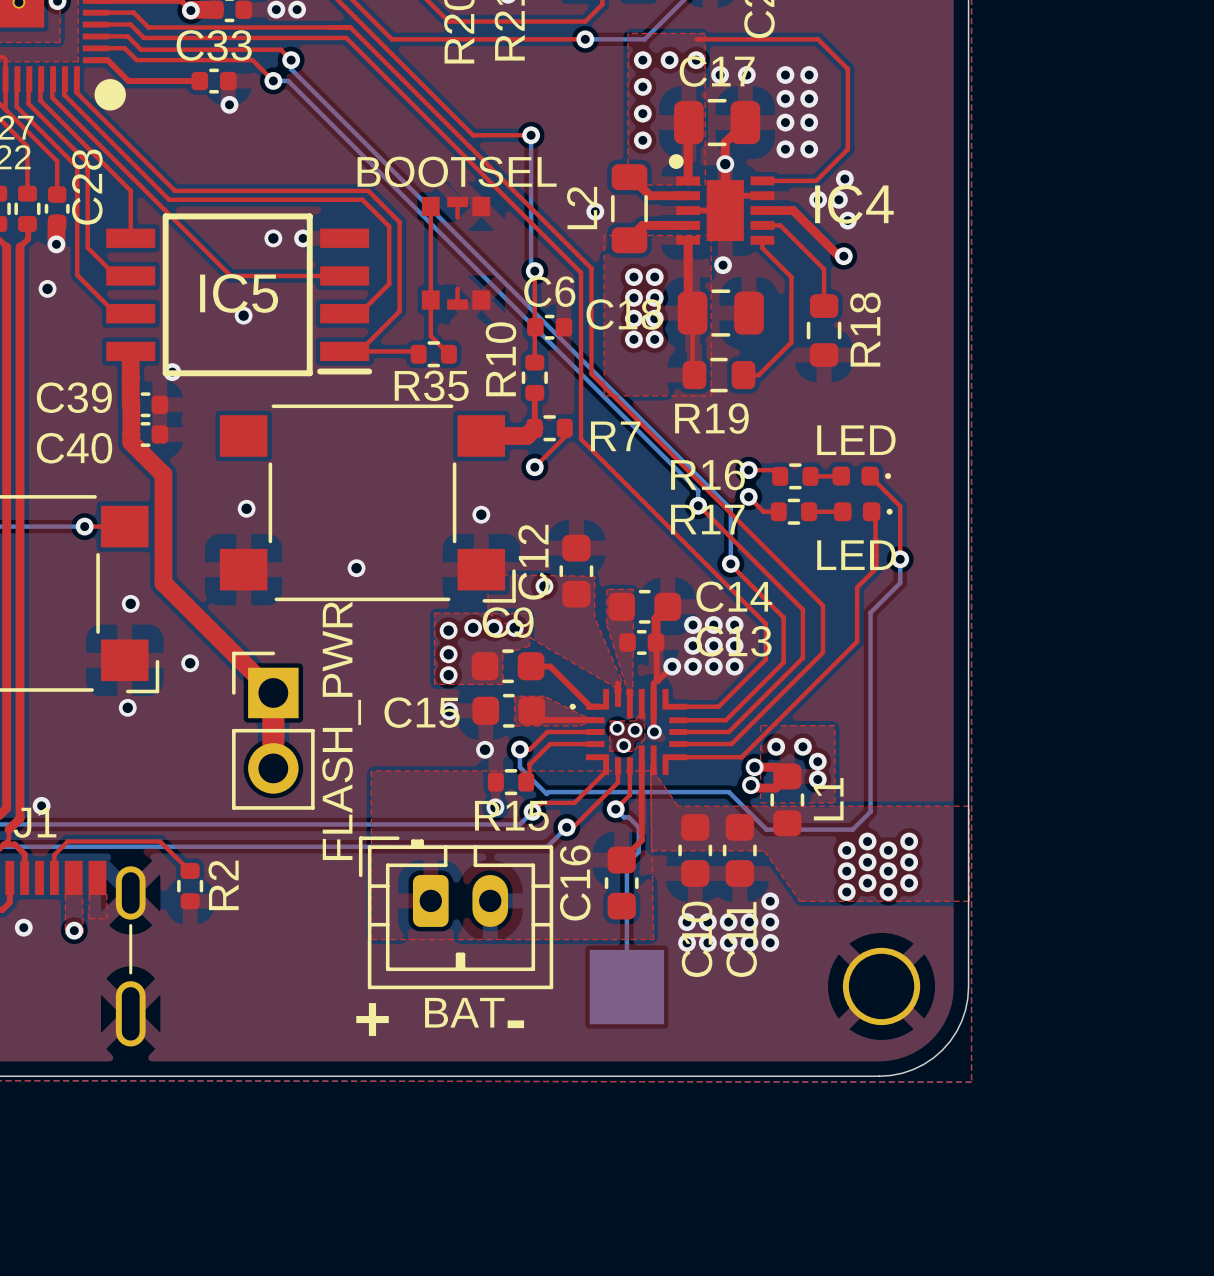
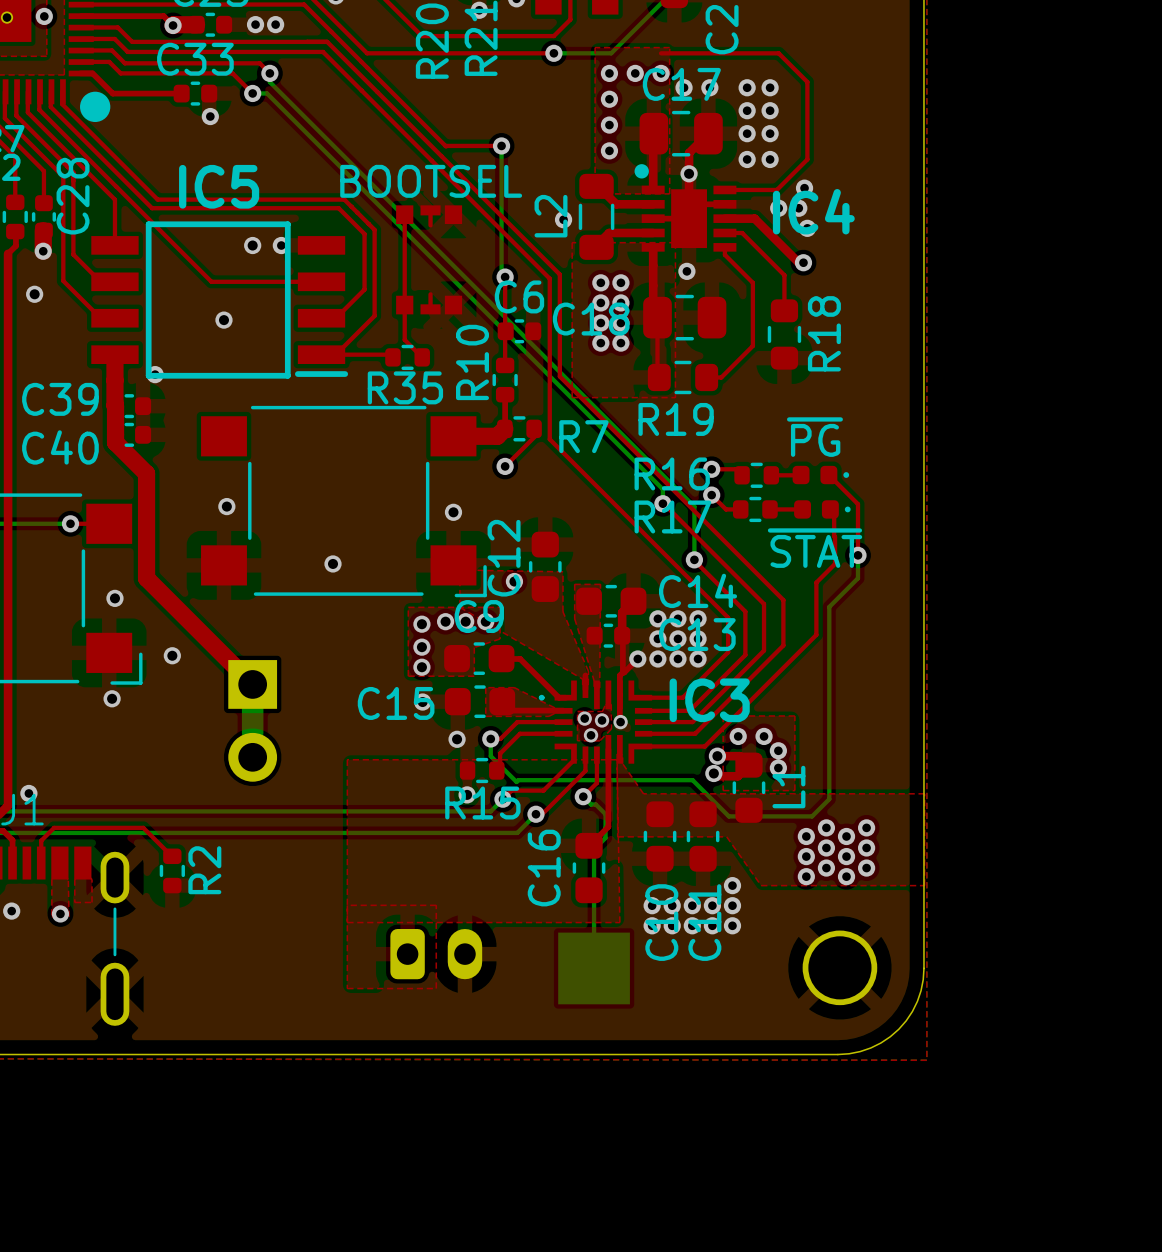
IC5 name position: IC5 (239, 293) -> IC5 (219, 186)
part value: LED (856, 440) -> ~{PG} (814, 437)
part value: LED (856, 555) -> ~{STAT} (815, 548)
IC3 name: none -> IC3 (709, 700)
part side: top (273, 730) -> bottom (252, 720)
part side: top (456, 912) -> bottom (436, 954)
top zone outline: none -> (347, 905) (436, 905) (436, 988) (347, 988) (347, 922)
text: + (372, 1019) -> none
text: - (515, 1024) -> none

